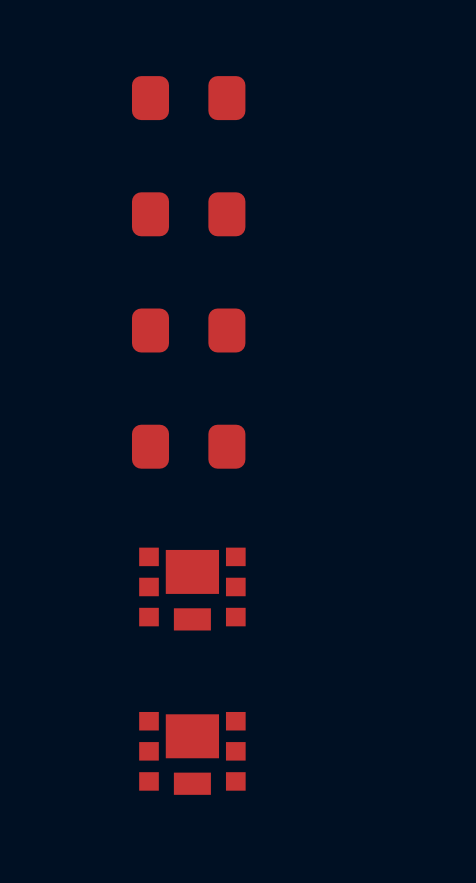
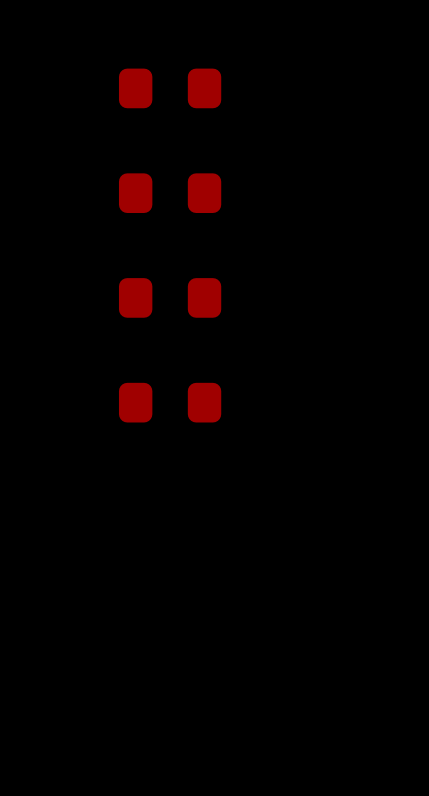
part: (192, 589) -> none
part: (192, 753) -> none

